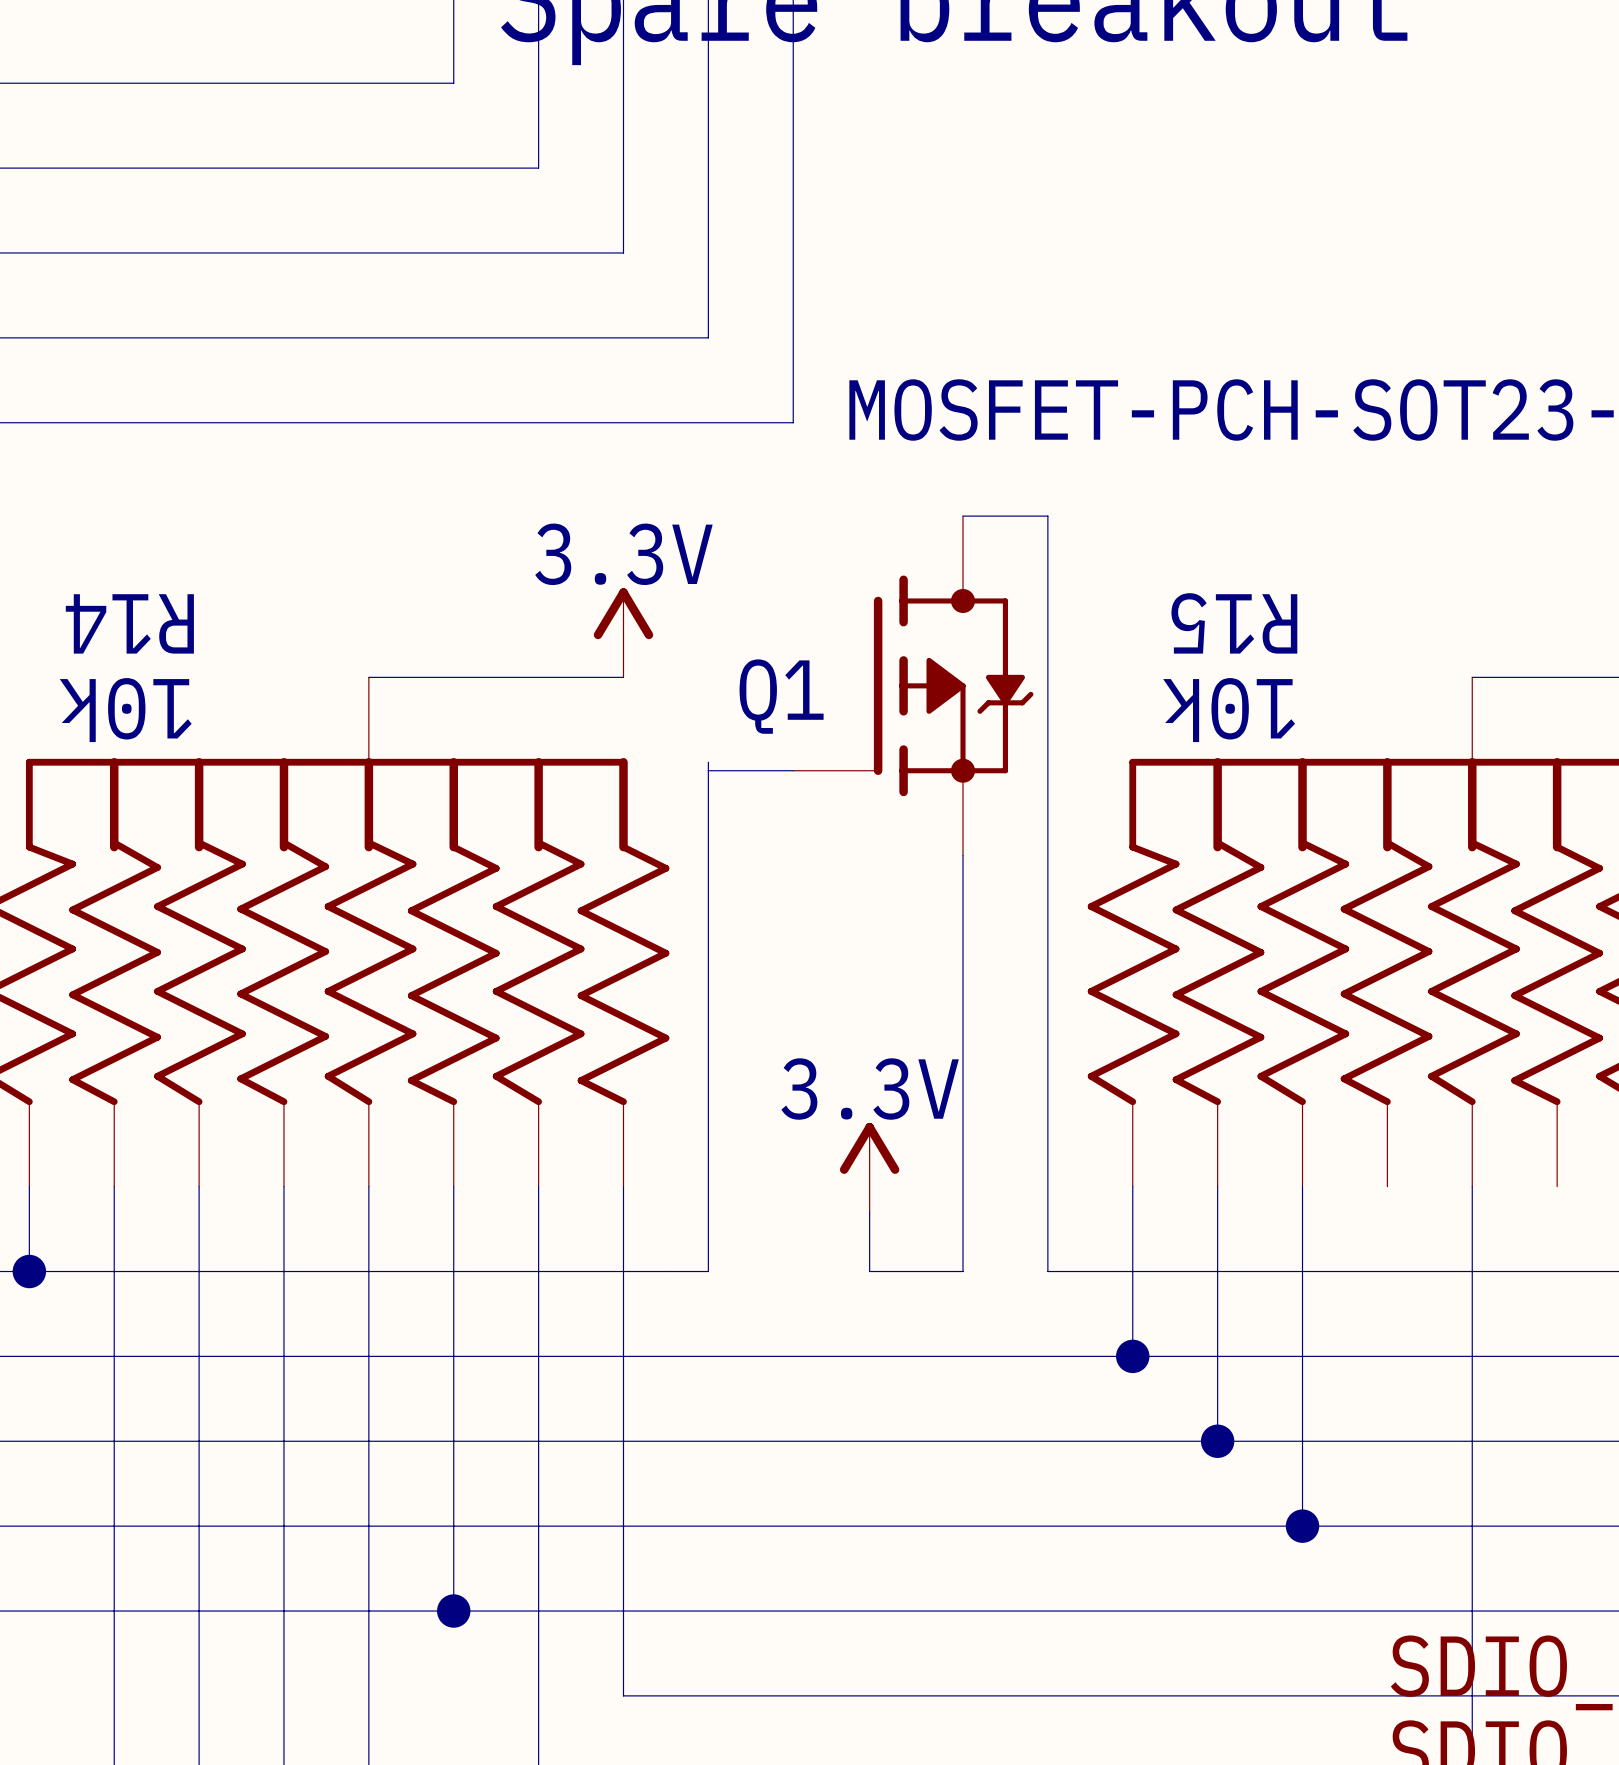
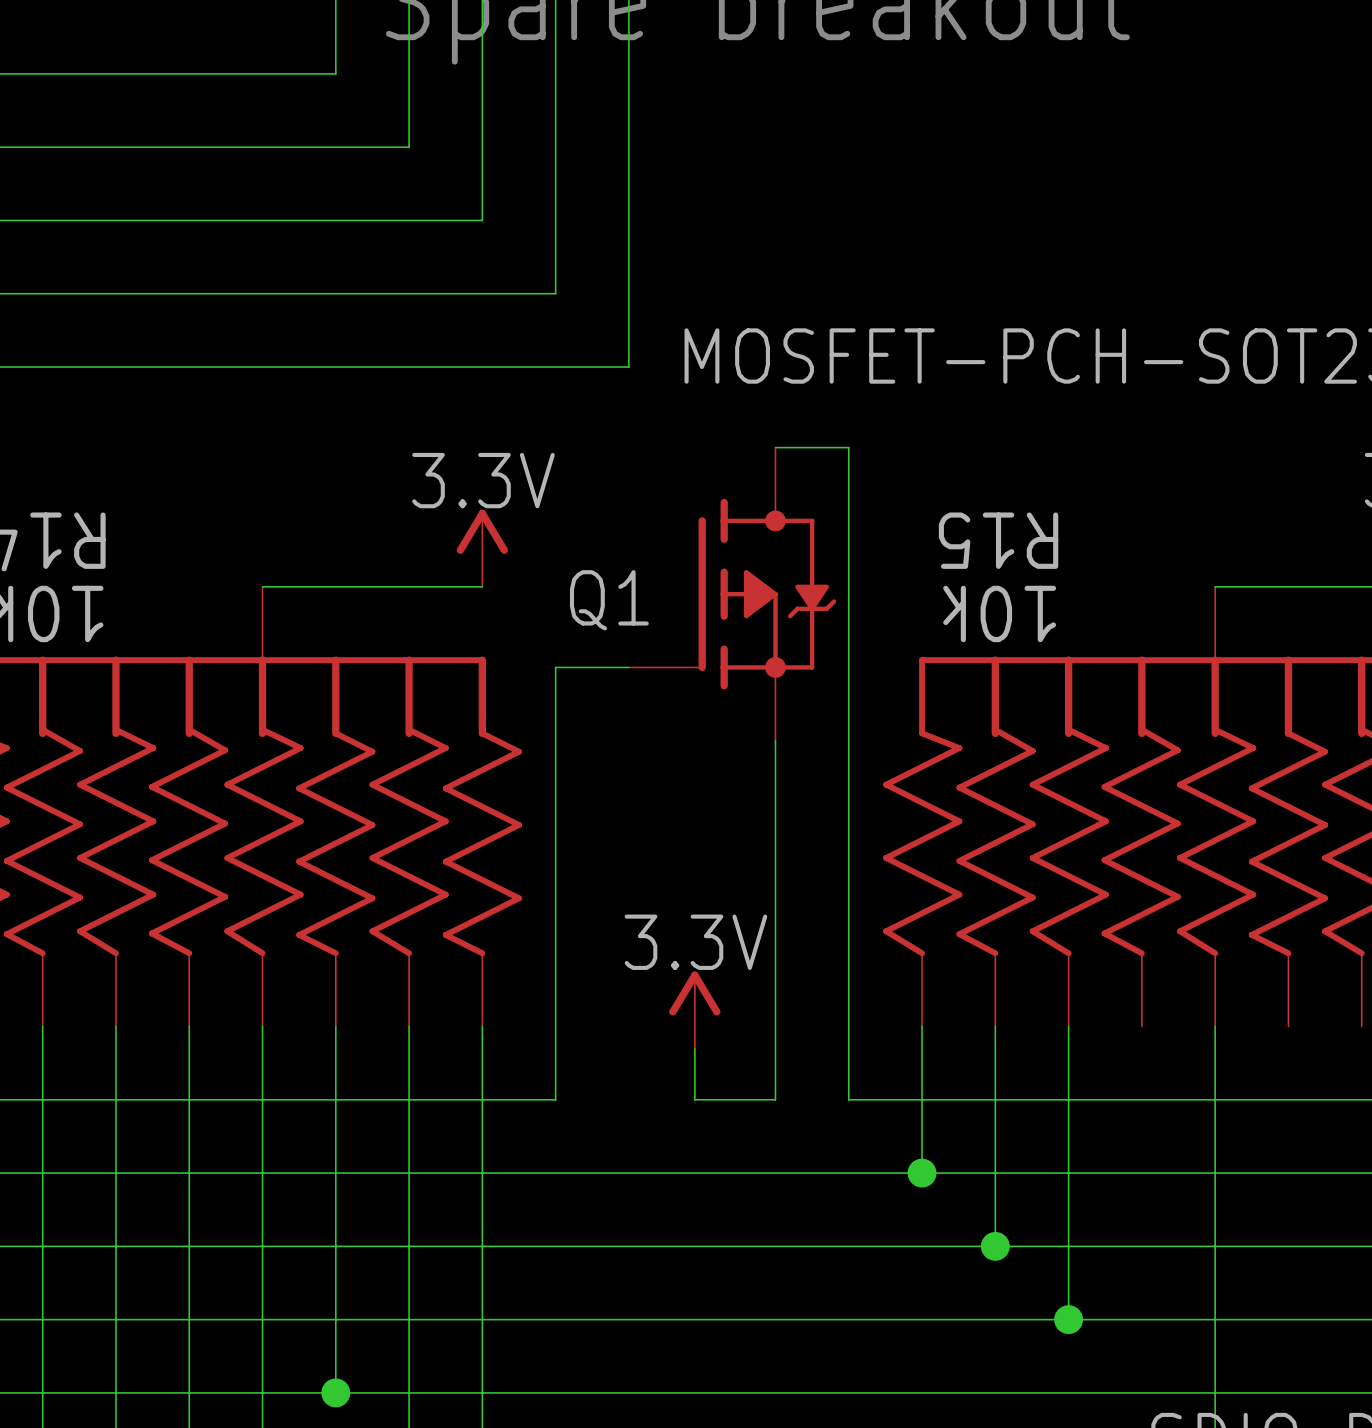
wire: (708, 762) (708, 770) -> none

